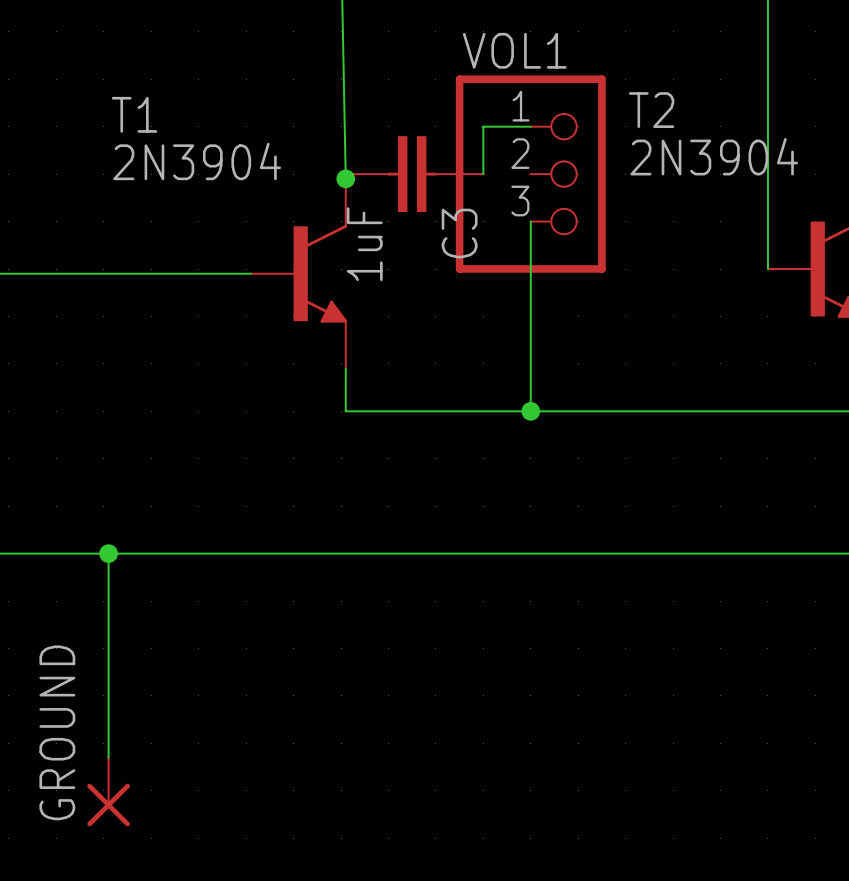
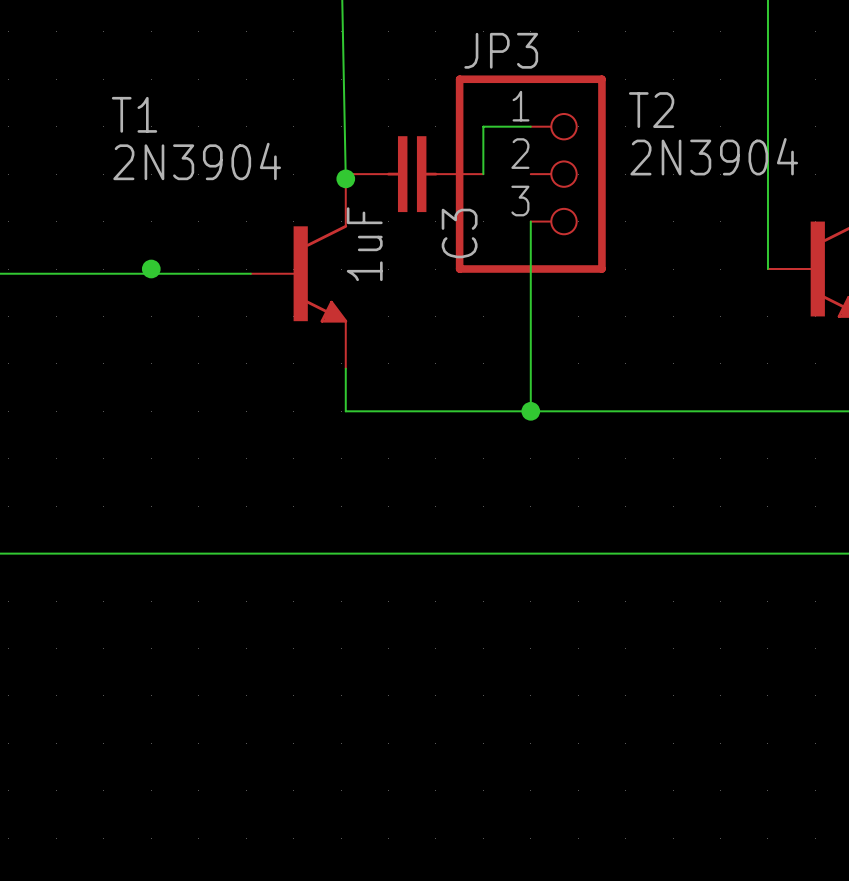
VOL1 name: VOL1 (514, 50) -> JP3 (501, 50)
junction: none -> (151, 269)
wire: (108, 553) (108, 757) -> none
junction: (108, 553) -> none
GROUND: (108, 792) -> none

